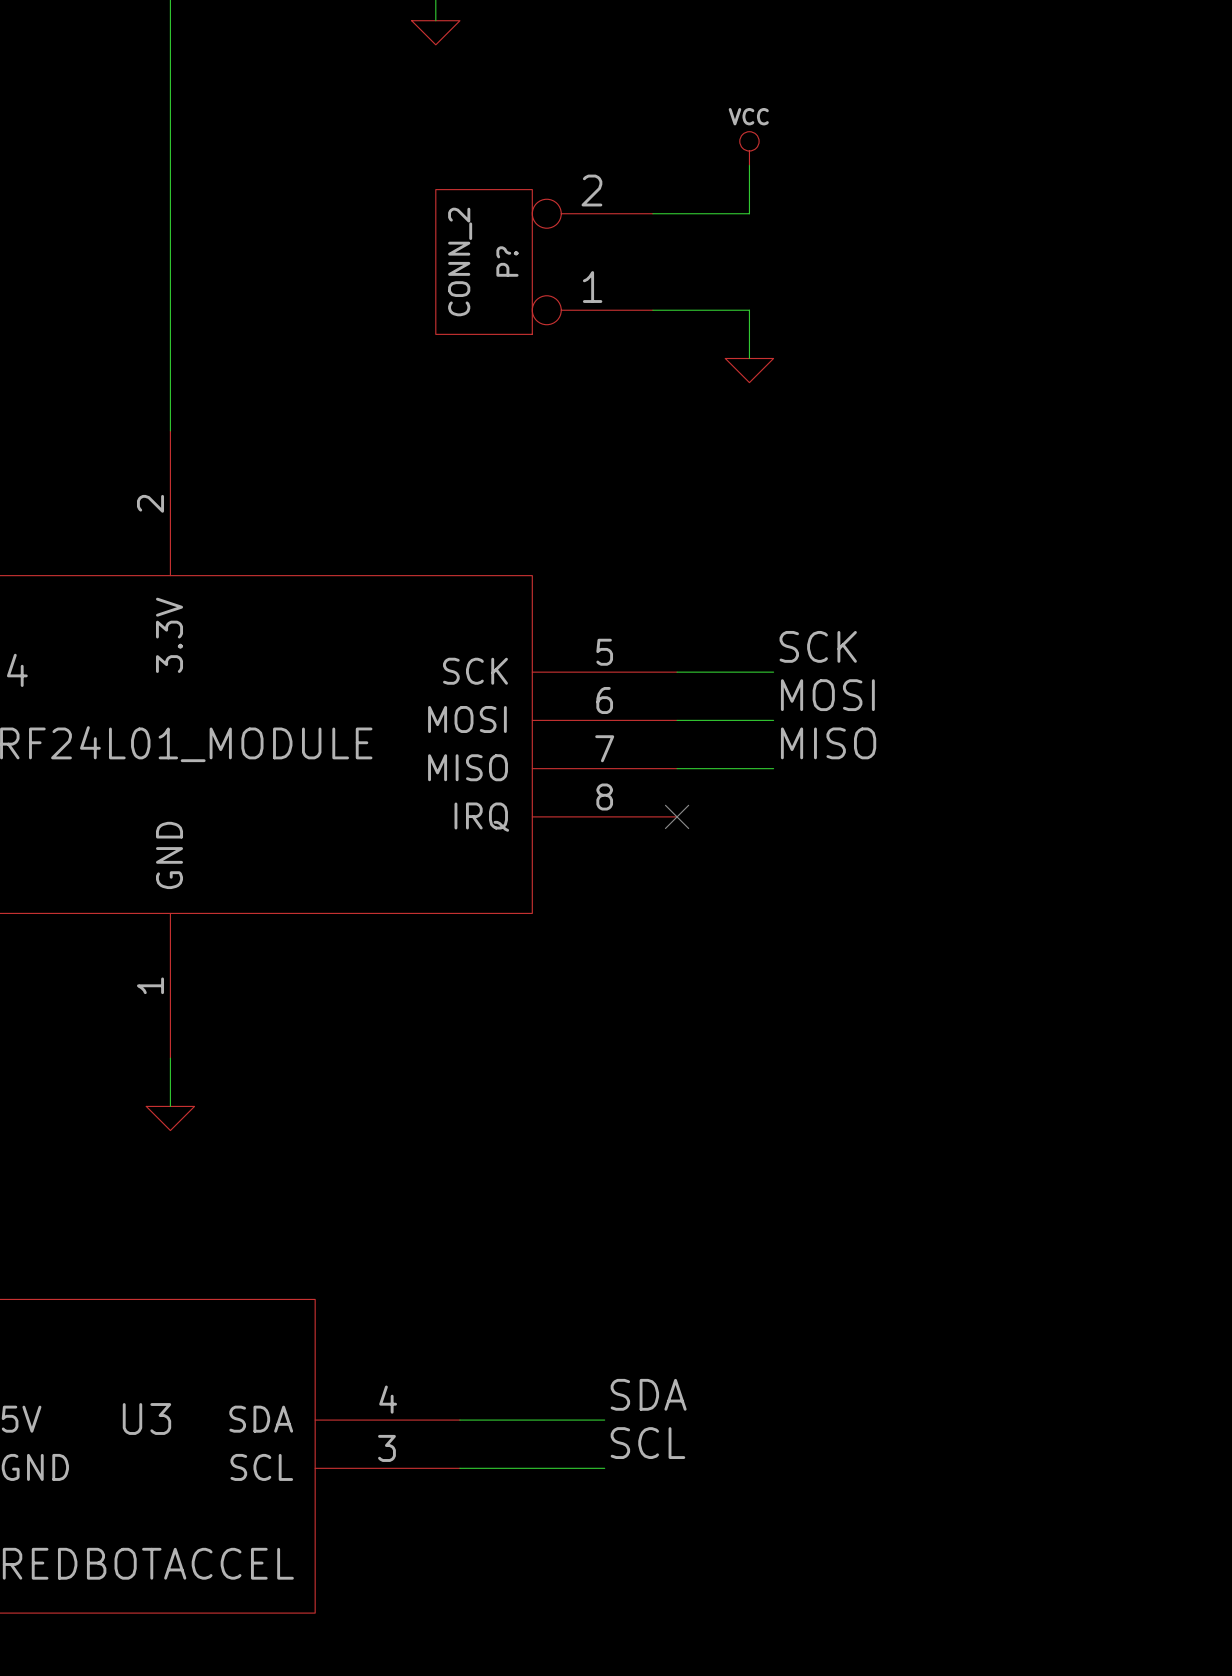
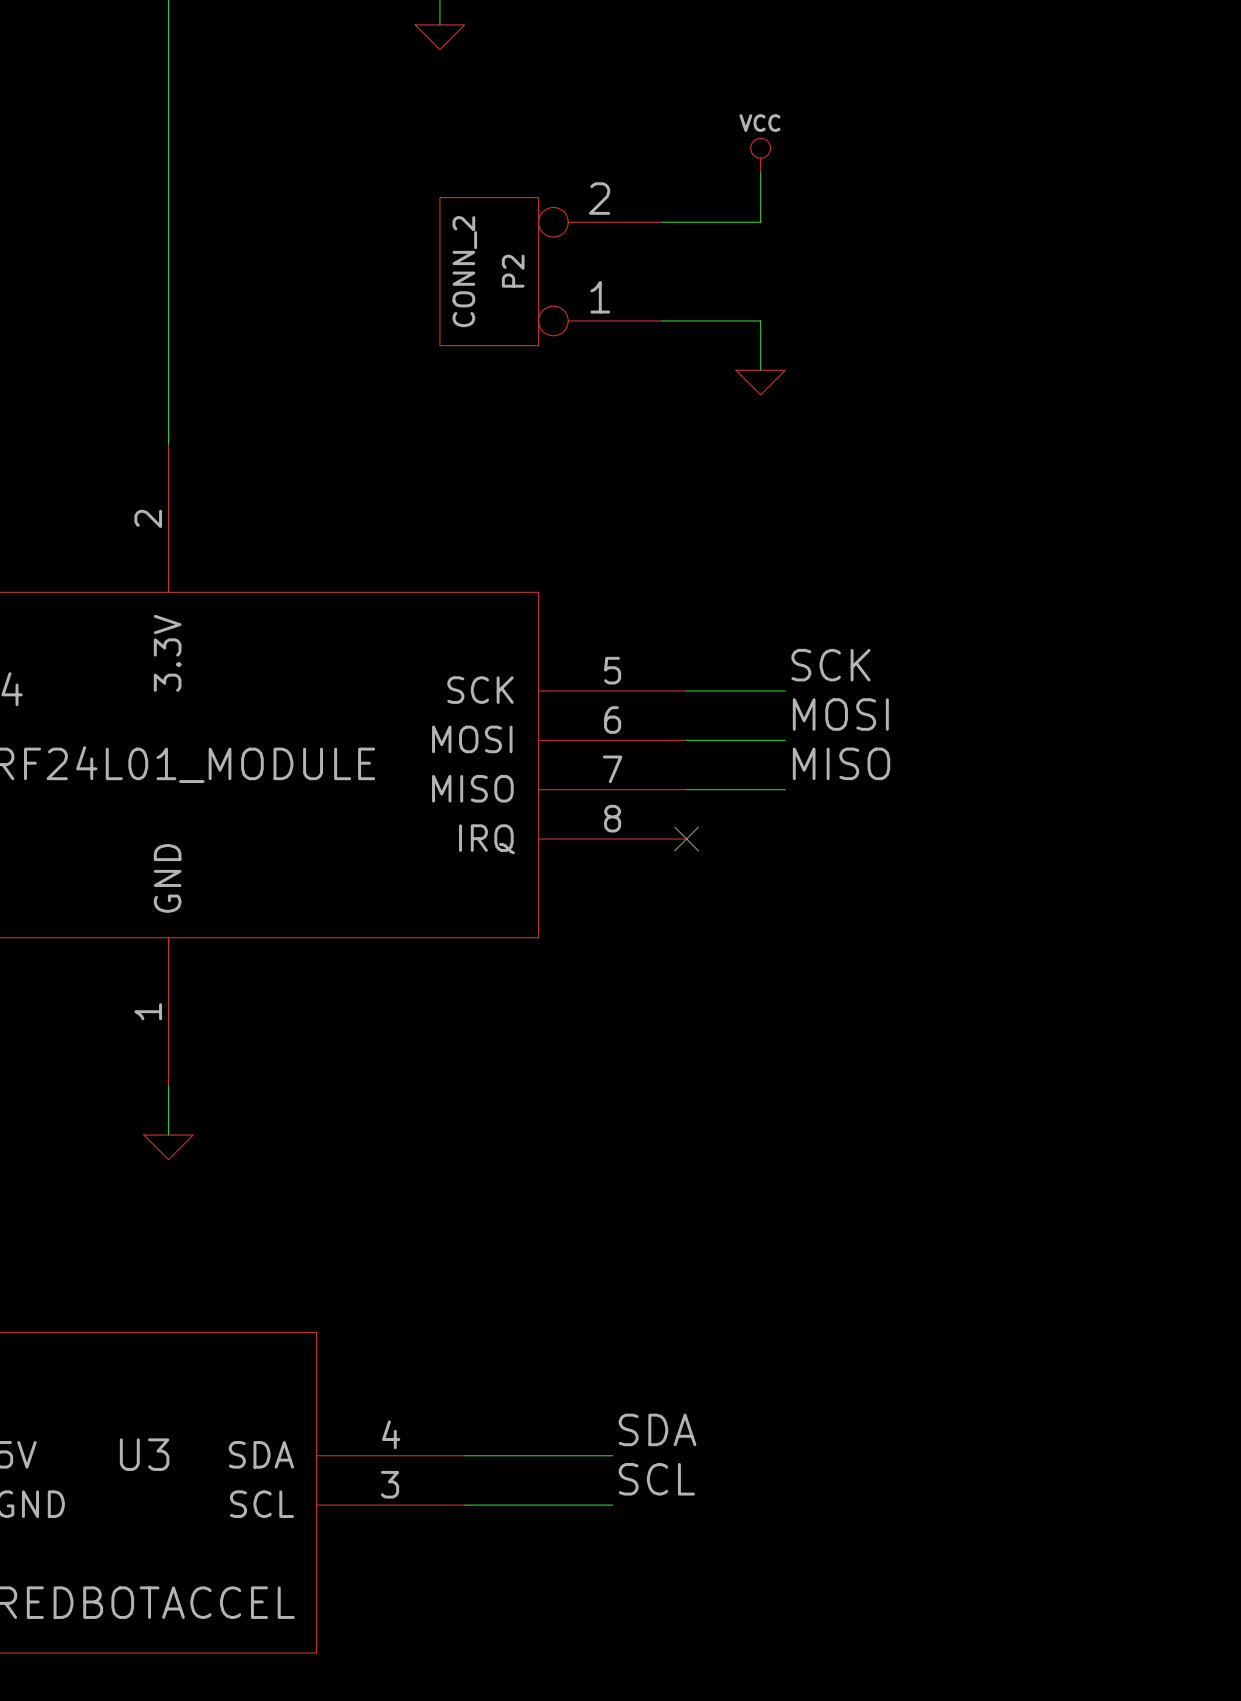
P? name: P? (507, 261) -> P2 (513, 271)

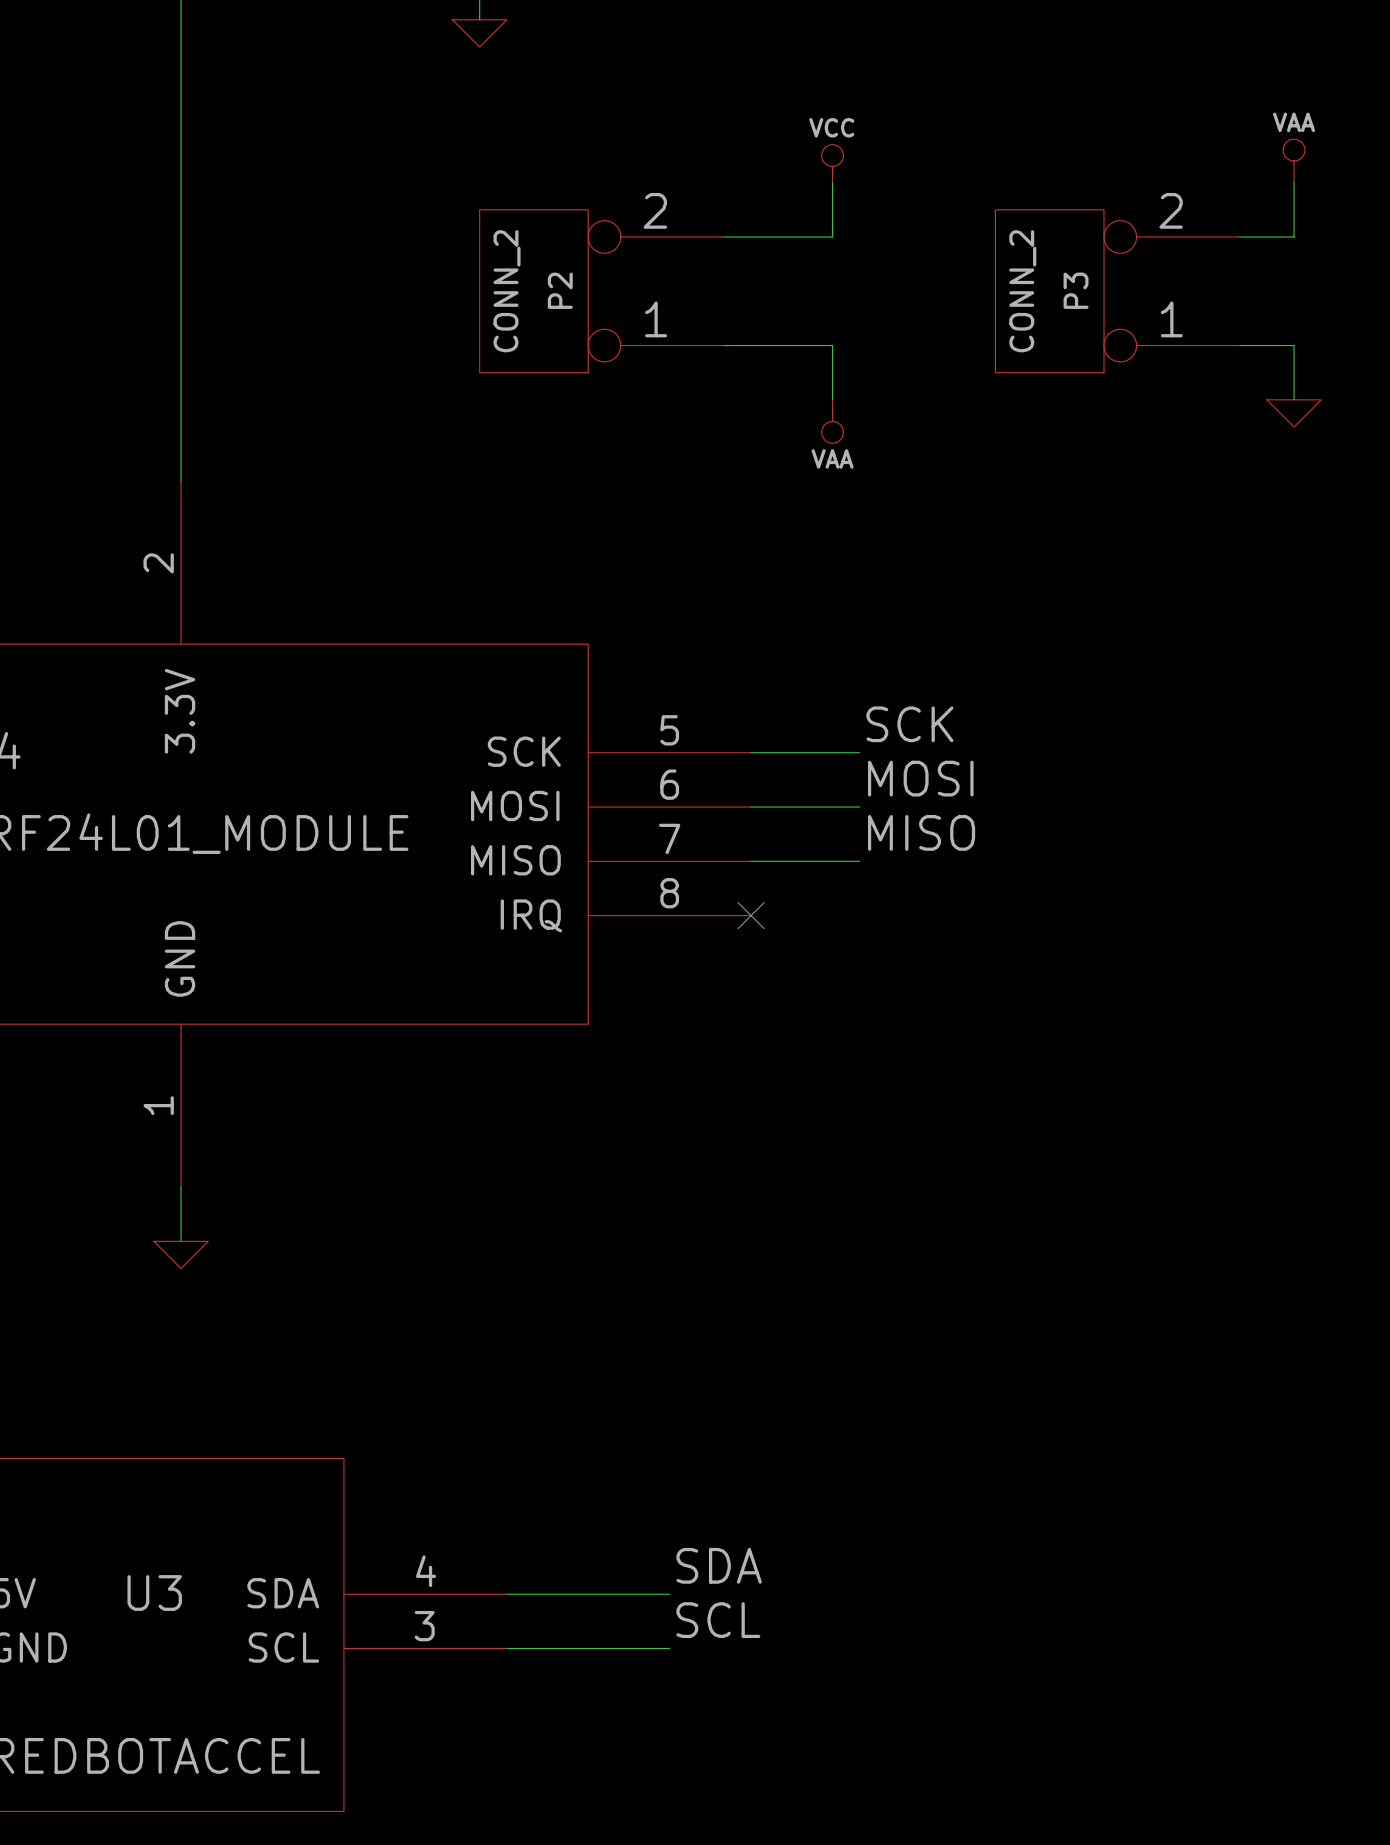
power symbol: none -> VAA (1294, 160)
wire: none -> (1294, 182) (1294, 236) (1239, 236)
P3: none -> CONN_2 (1117, 291)
wire: none -> (1239, 345) (1294, 345) (1294, 399)
power symbol shape: [735, 370, 786, 395] -> [821, 399, 844, 444]
power symbol: none -> (1294, 413)
power symbol text: none -> VAA (832, 458)

